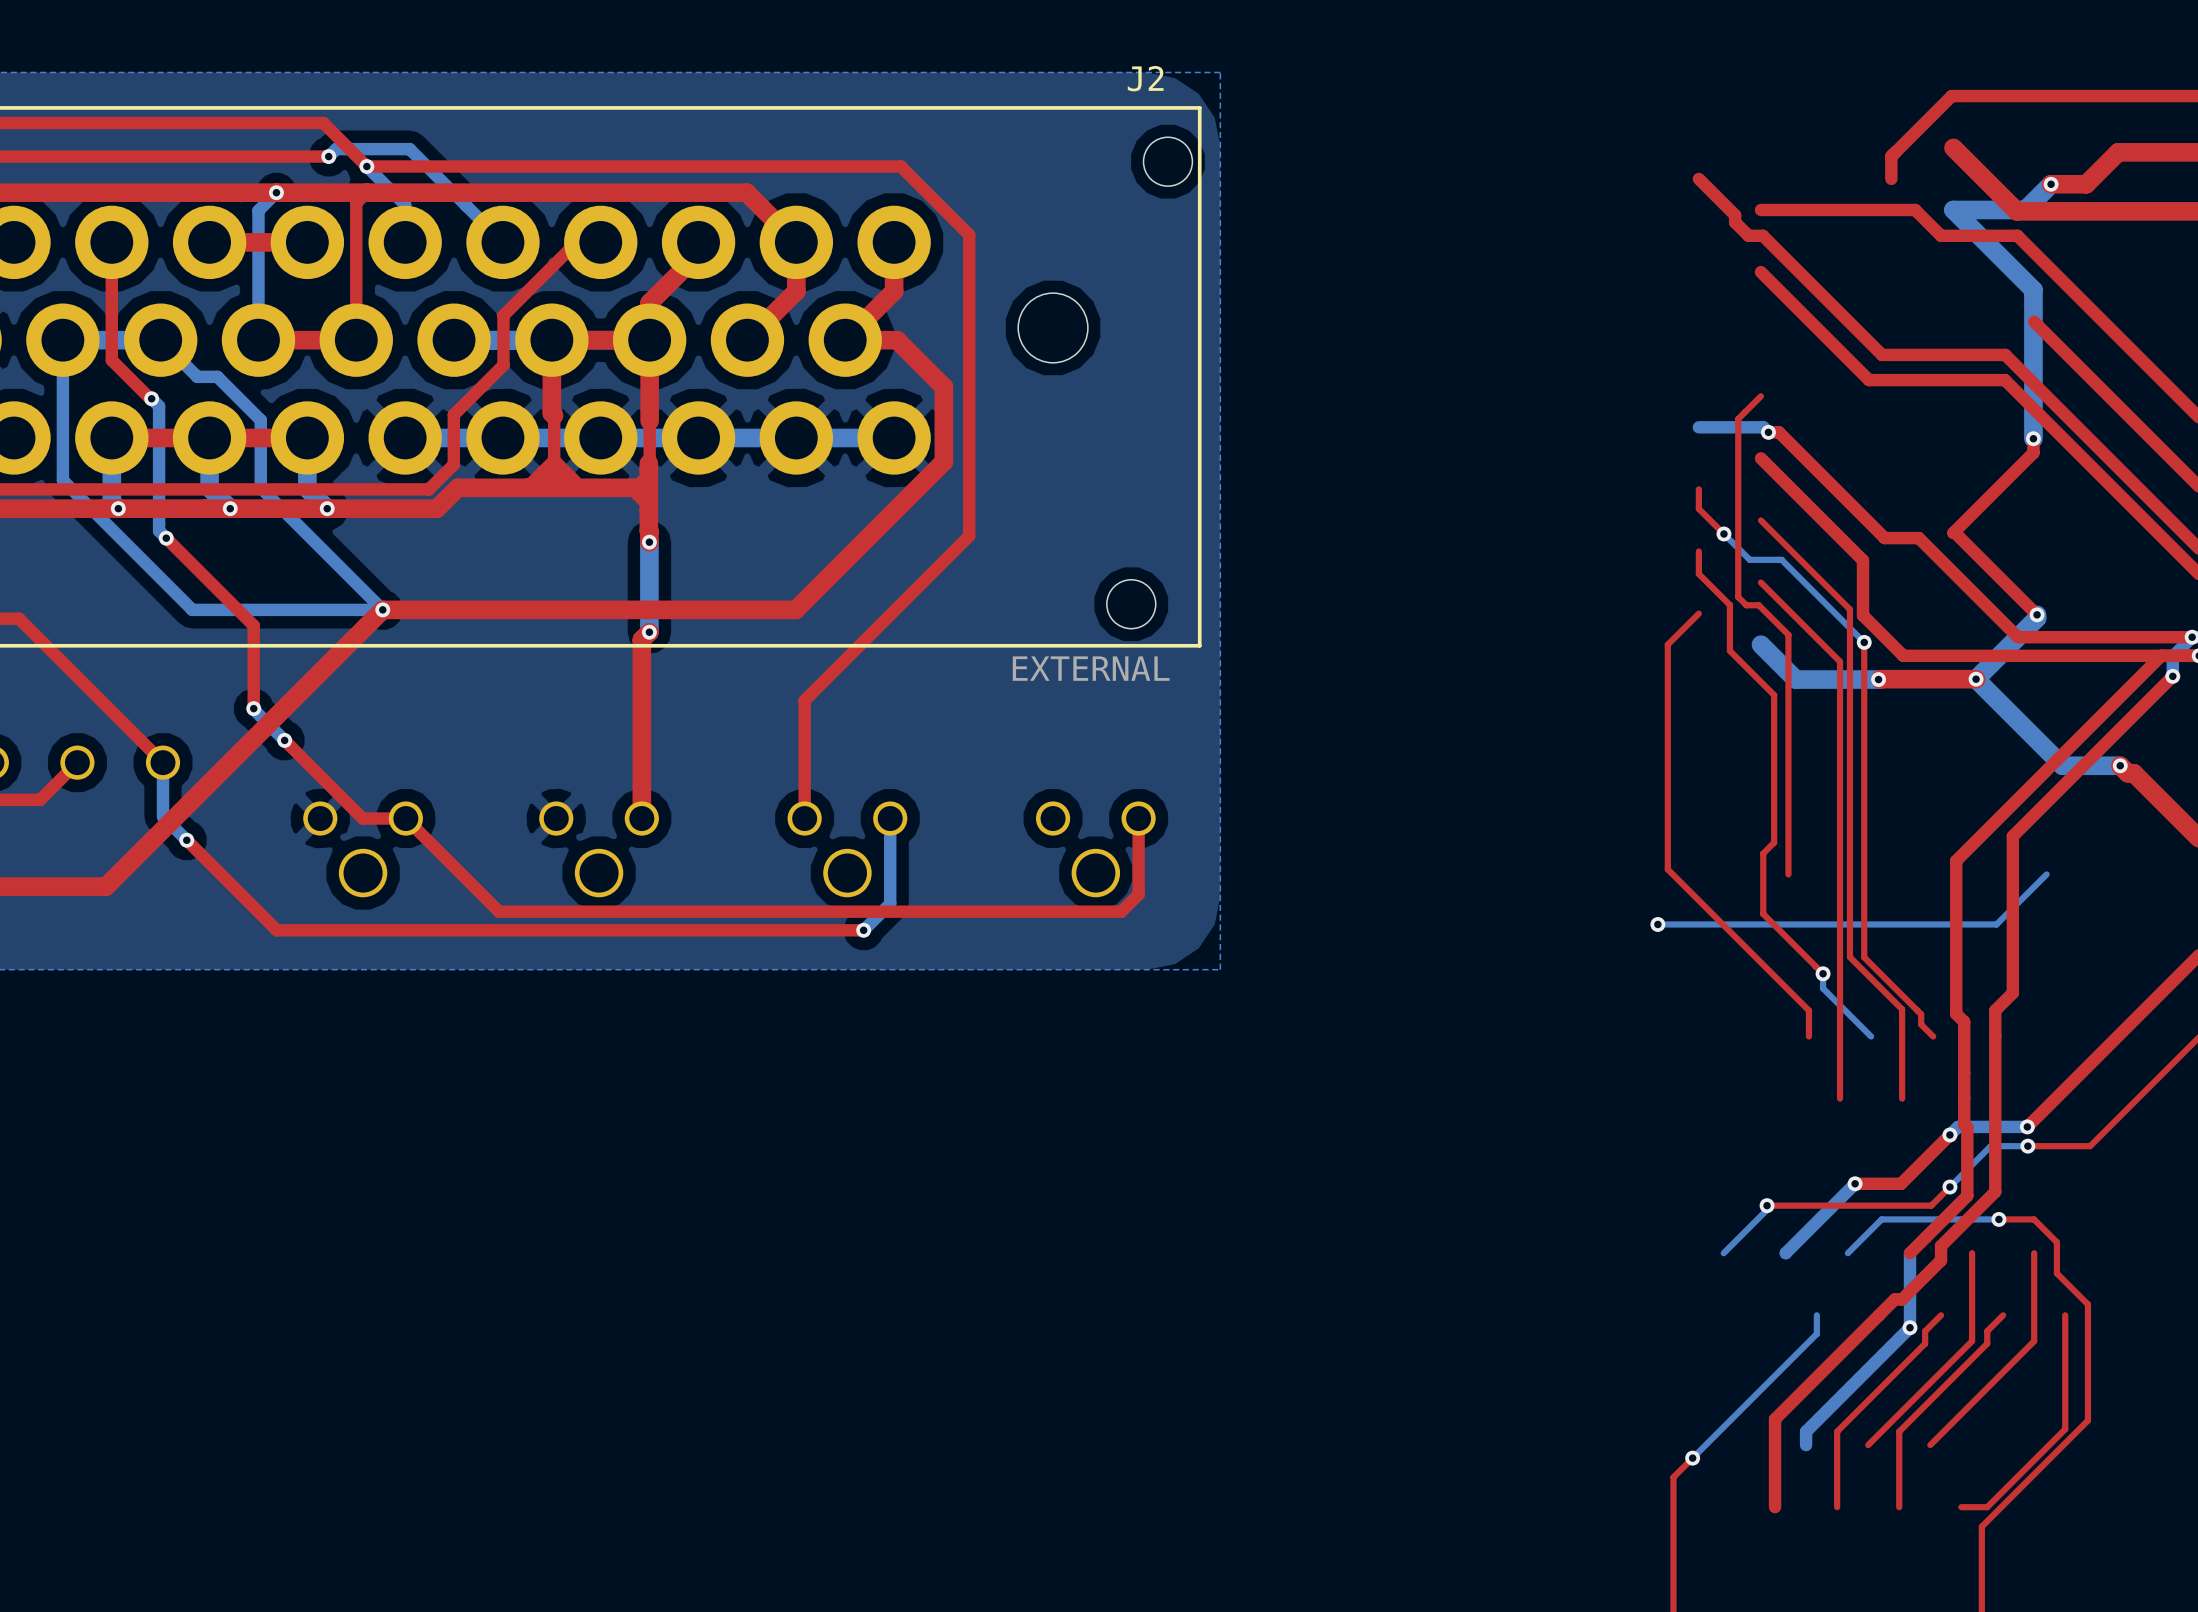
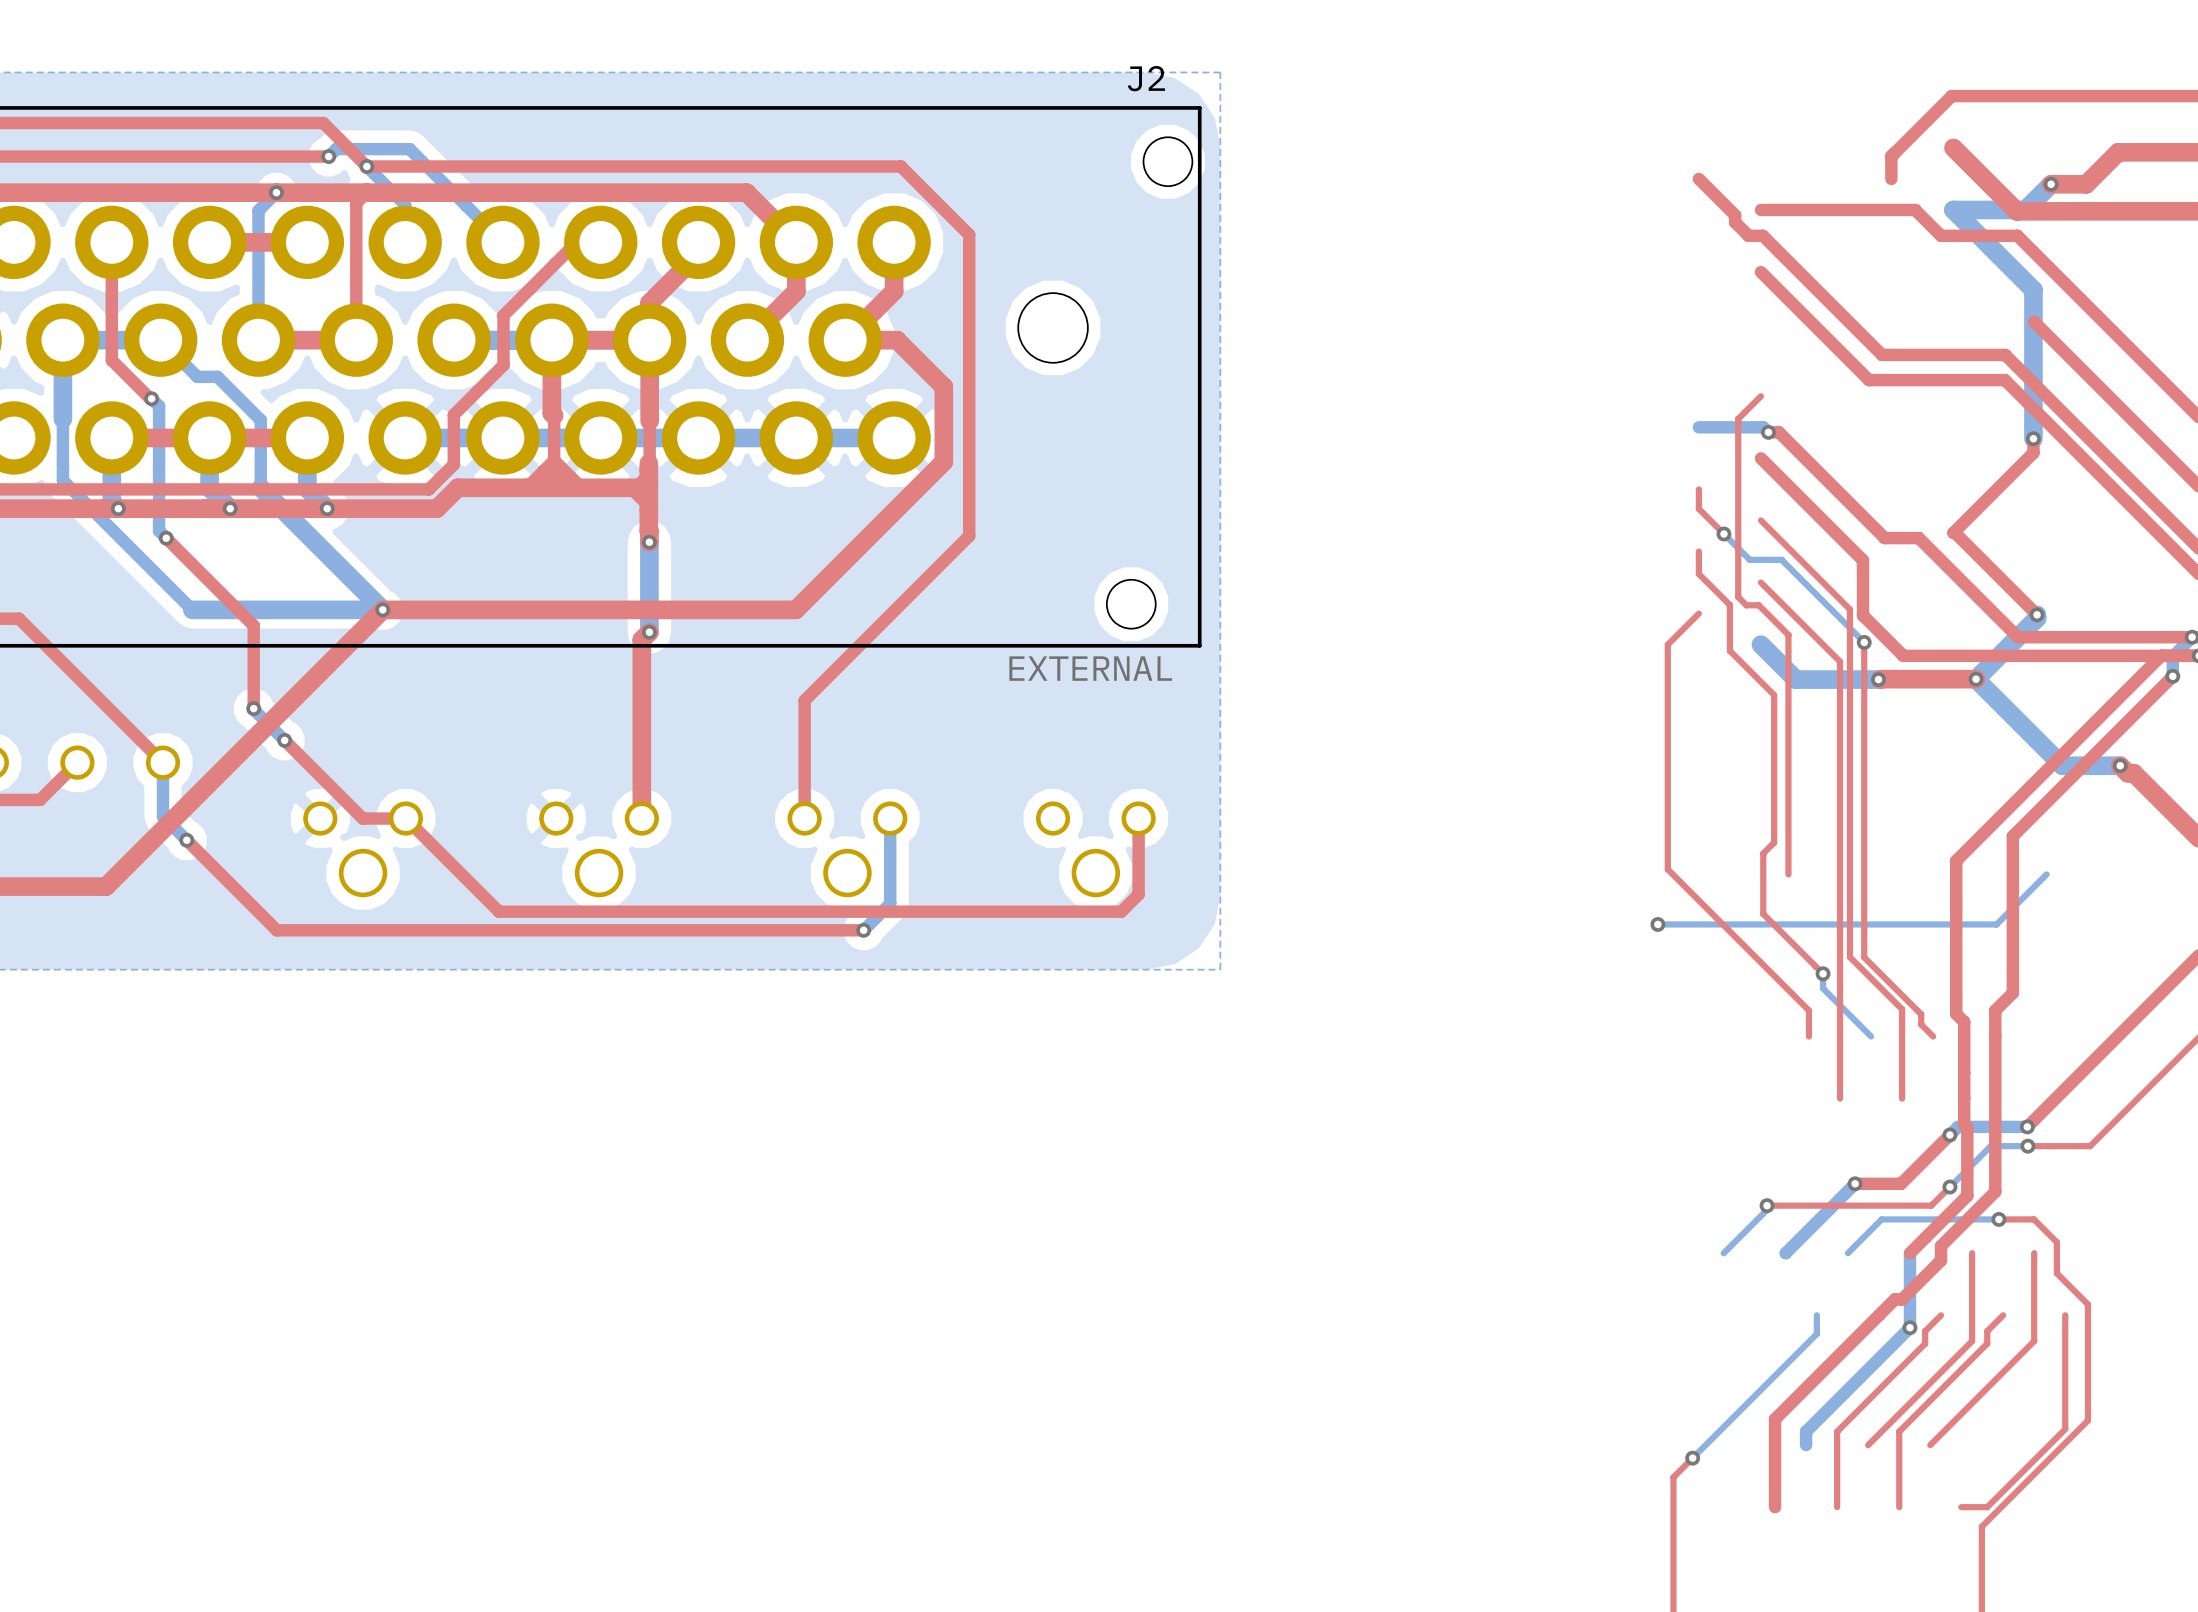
bottom track width: thin (62, 340) (62, 419) -> thick (62, 340) (62, 419)
bottom track width: thin (260, 487) (382, 609) (192, 609) -> thick (260, 487) (382, 609) (192, 609)

